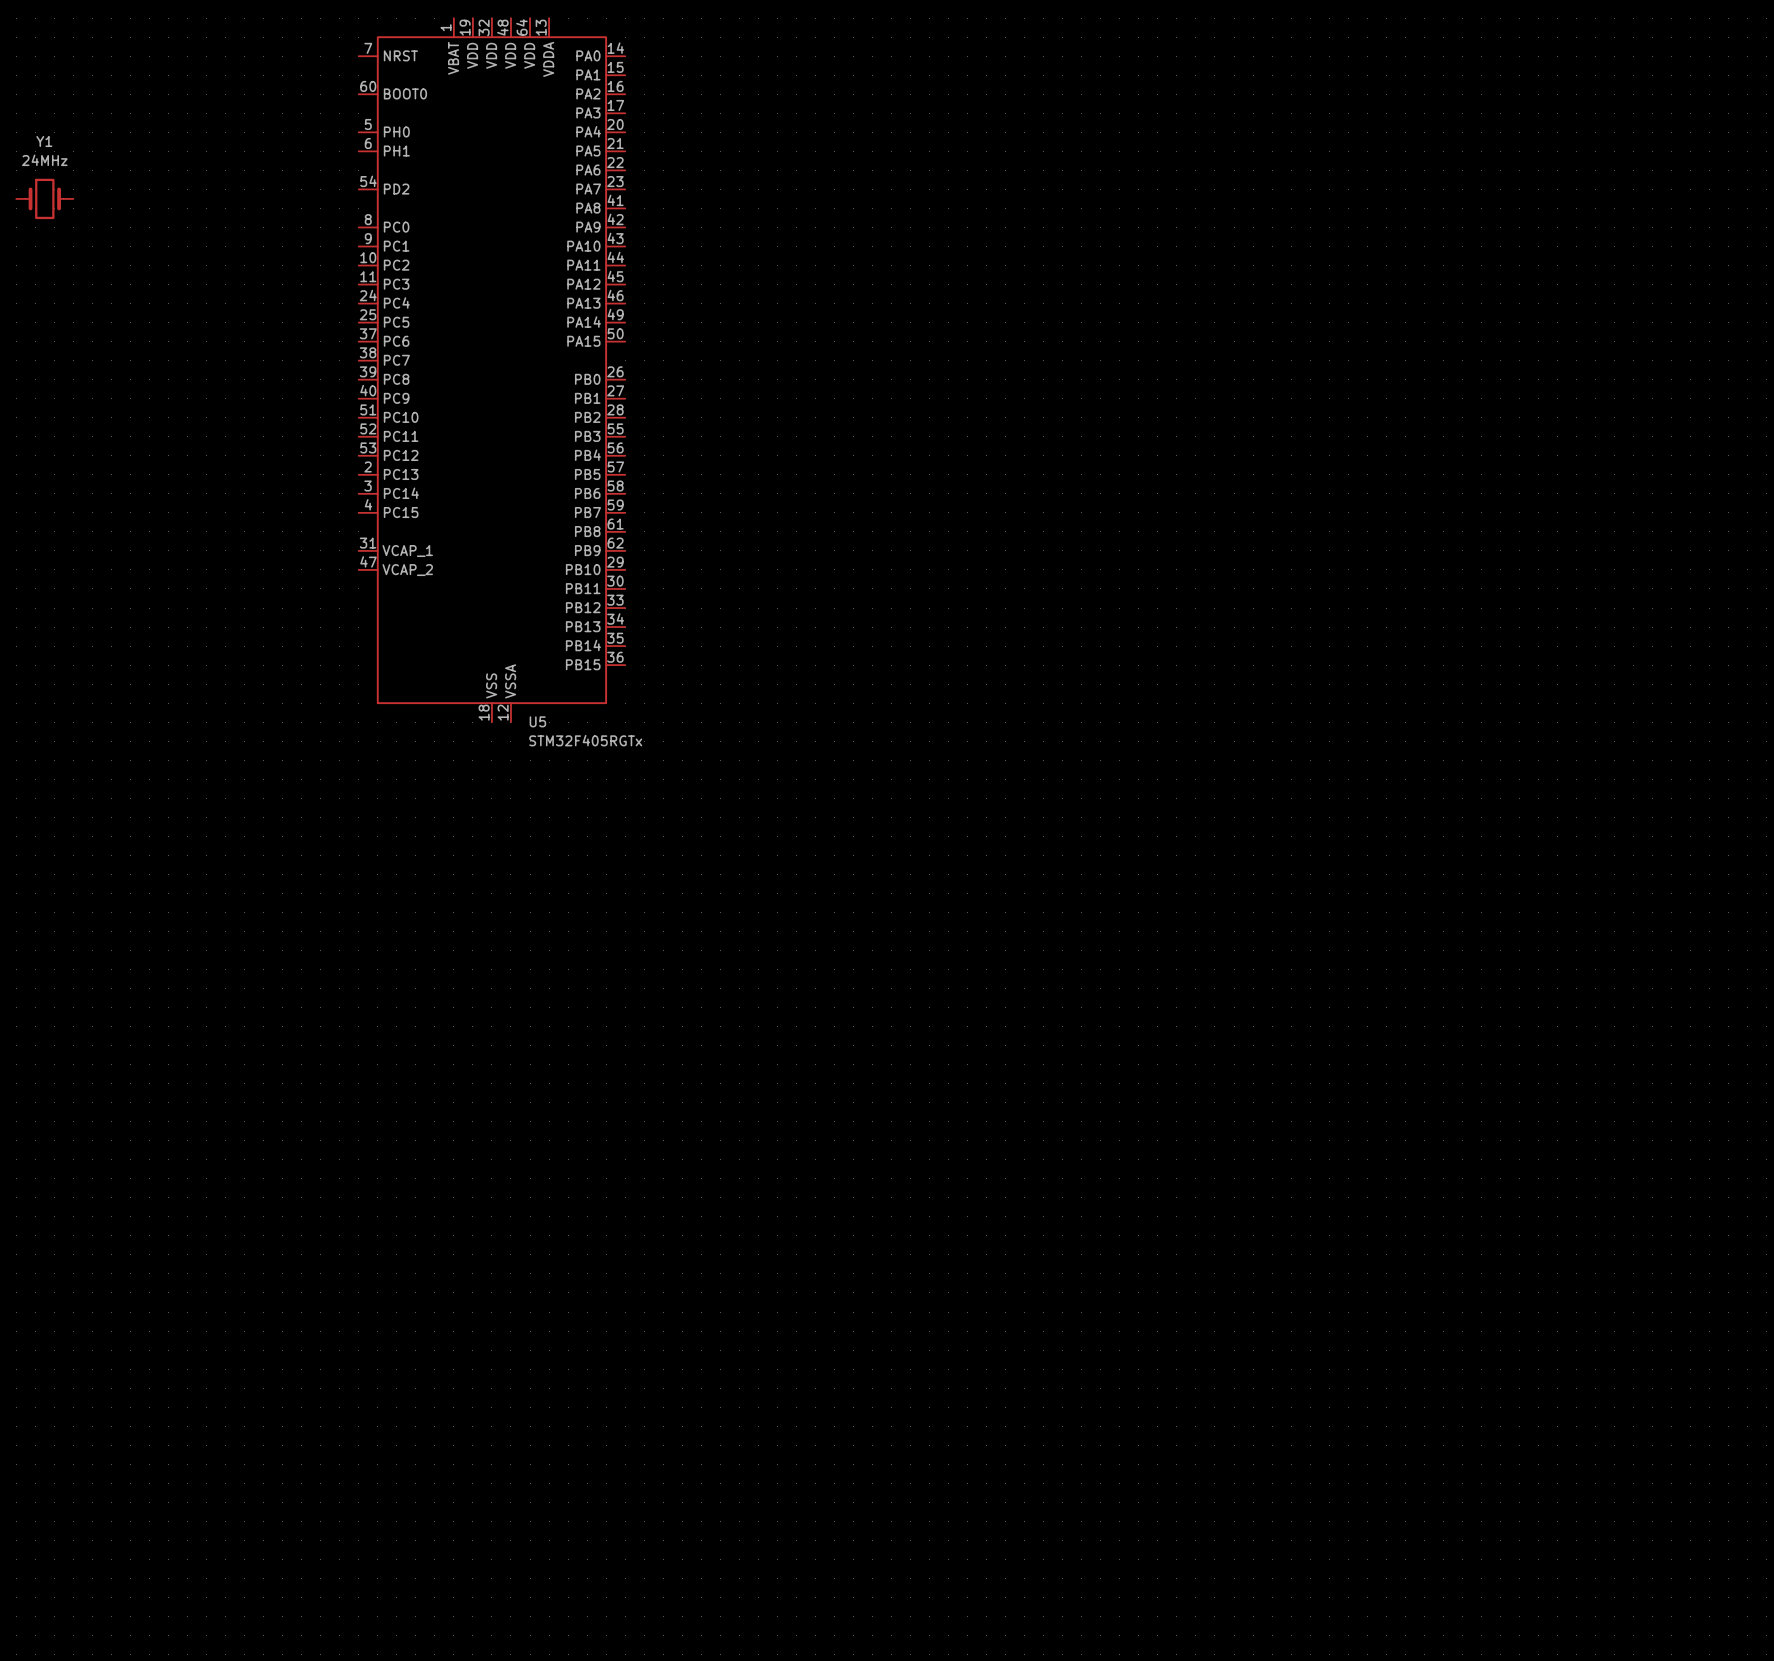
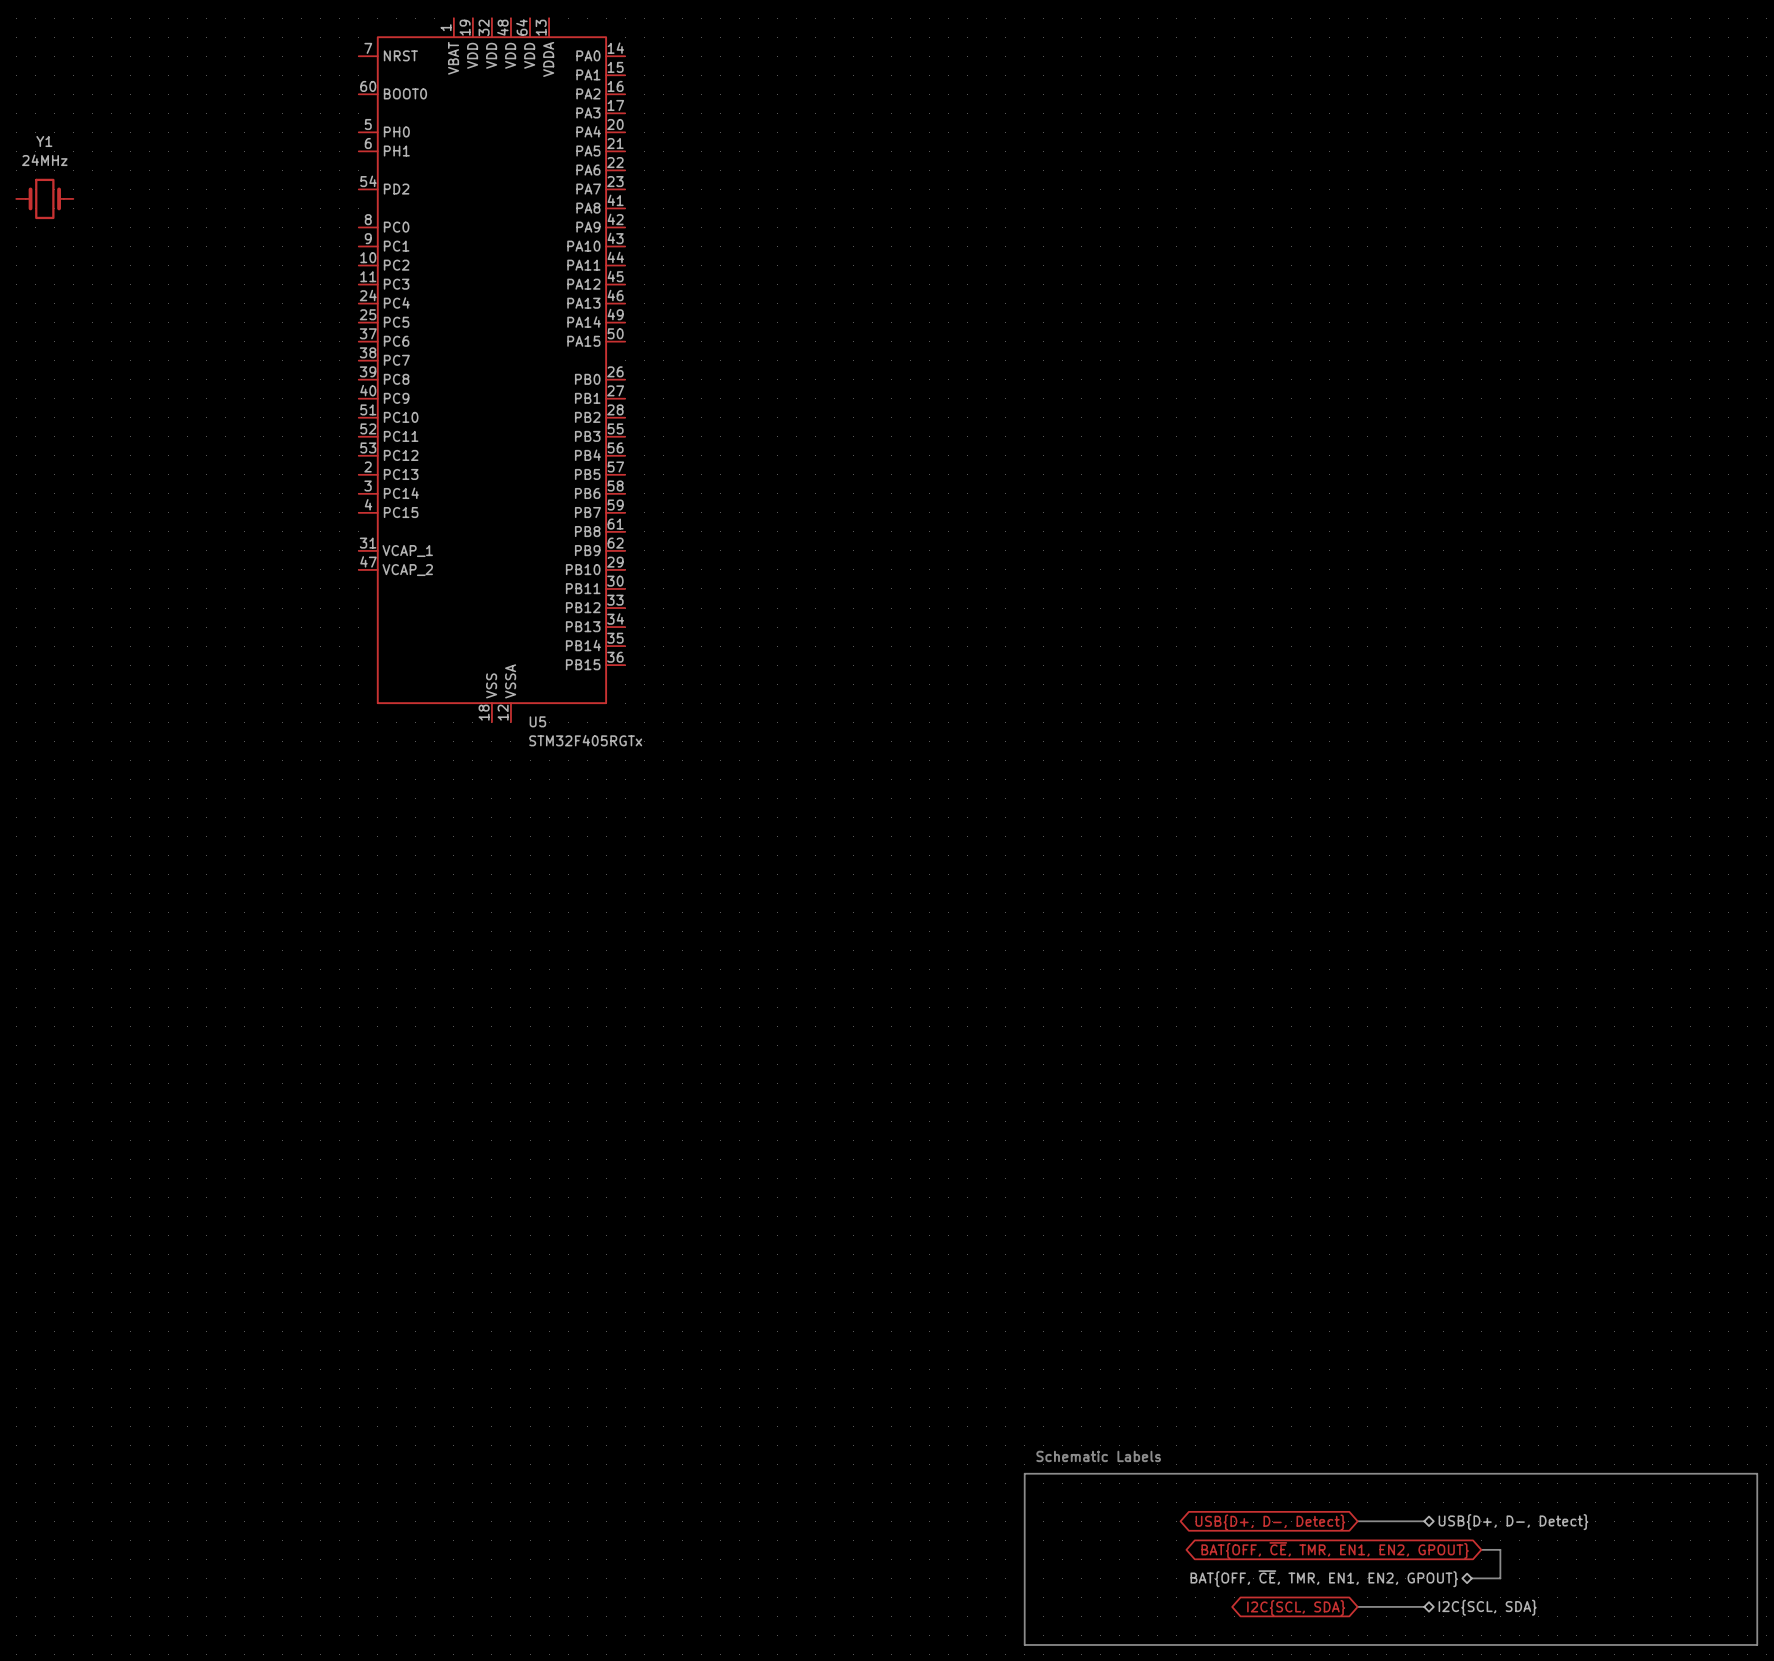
text: none -> Schematic Labels (1098, 1456)
line: none -> (1024, 1473) (1757, 1473) (1757, 1644) (1024, 1644) (1024, 1473)
bus: none -> (1357, 1521) (1424, 1521)
global label: none -> USB{D+, D-, Detect} (1270, 1522)
hierarchical label: none -> USB{D+, D-, Detect} (1513, 1522)
bus: none -> (1481, 1549) (1500, 1549) (1500, 1578) (1471, 1578)
global label: none -> BAT{OFF, ~{CE}, TMR, EN1, EN2, GPOUT} (1335, 1550)
hierarchical label: none -> BAT{OFF, ~{CE}, TMR, EN1, EN2, GPOUT} (1324, 1578)
bus: none -> (1357, 1606) (1424, 1606)
hierarchical label: none -> I2C{SCL, SDA} (1487, 1607)
global label: none -> I2C{SCL, SDA} (1296, 1608)

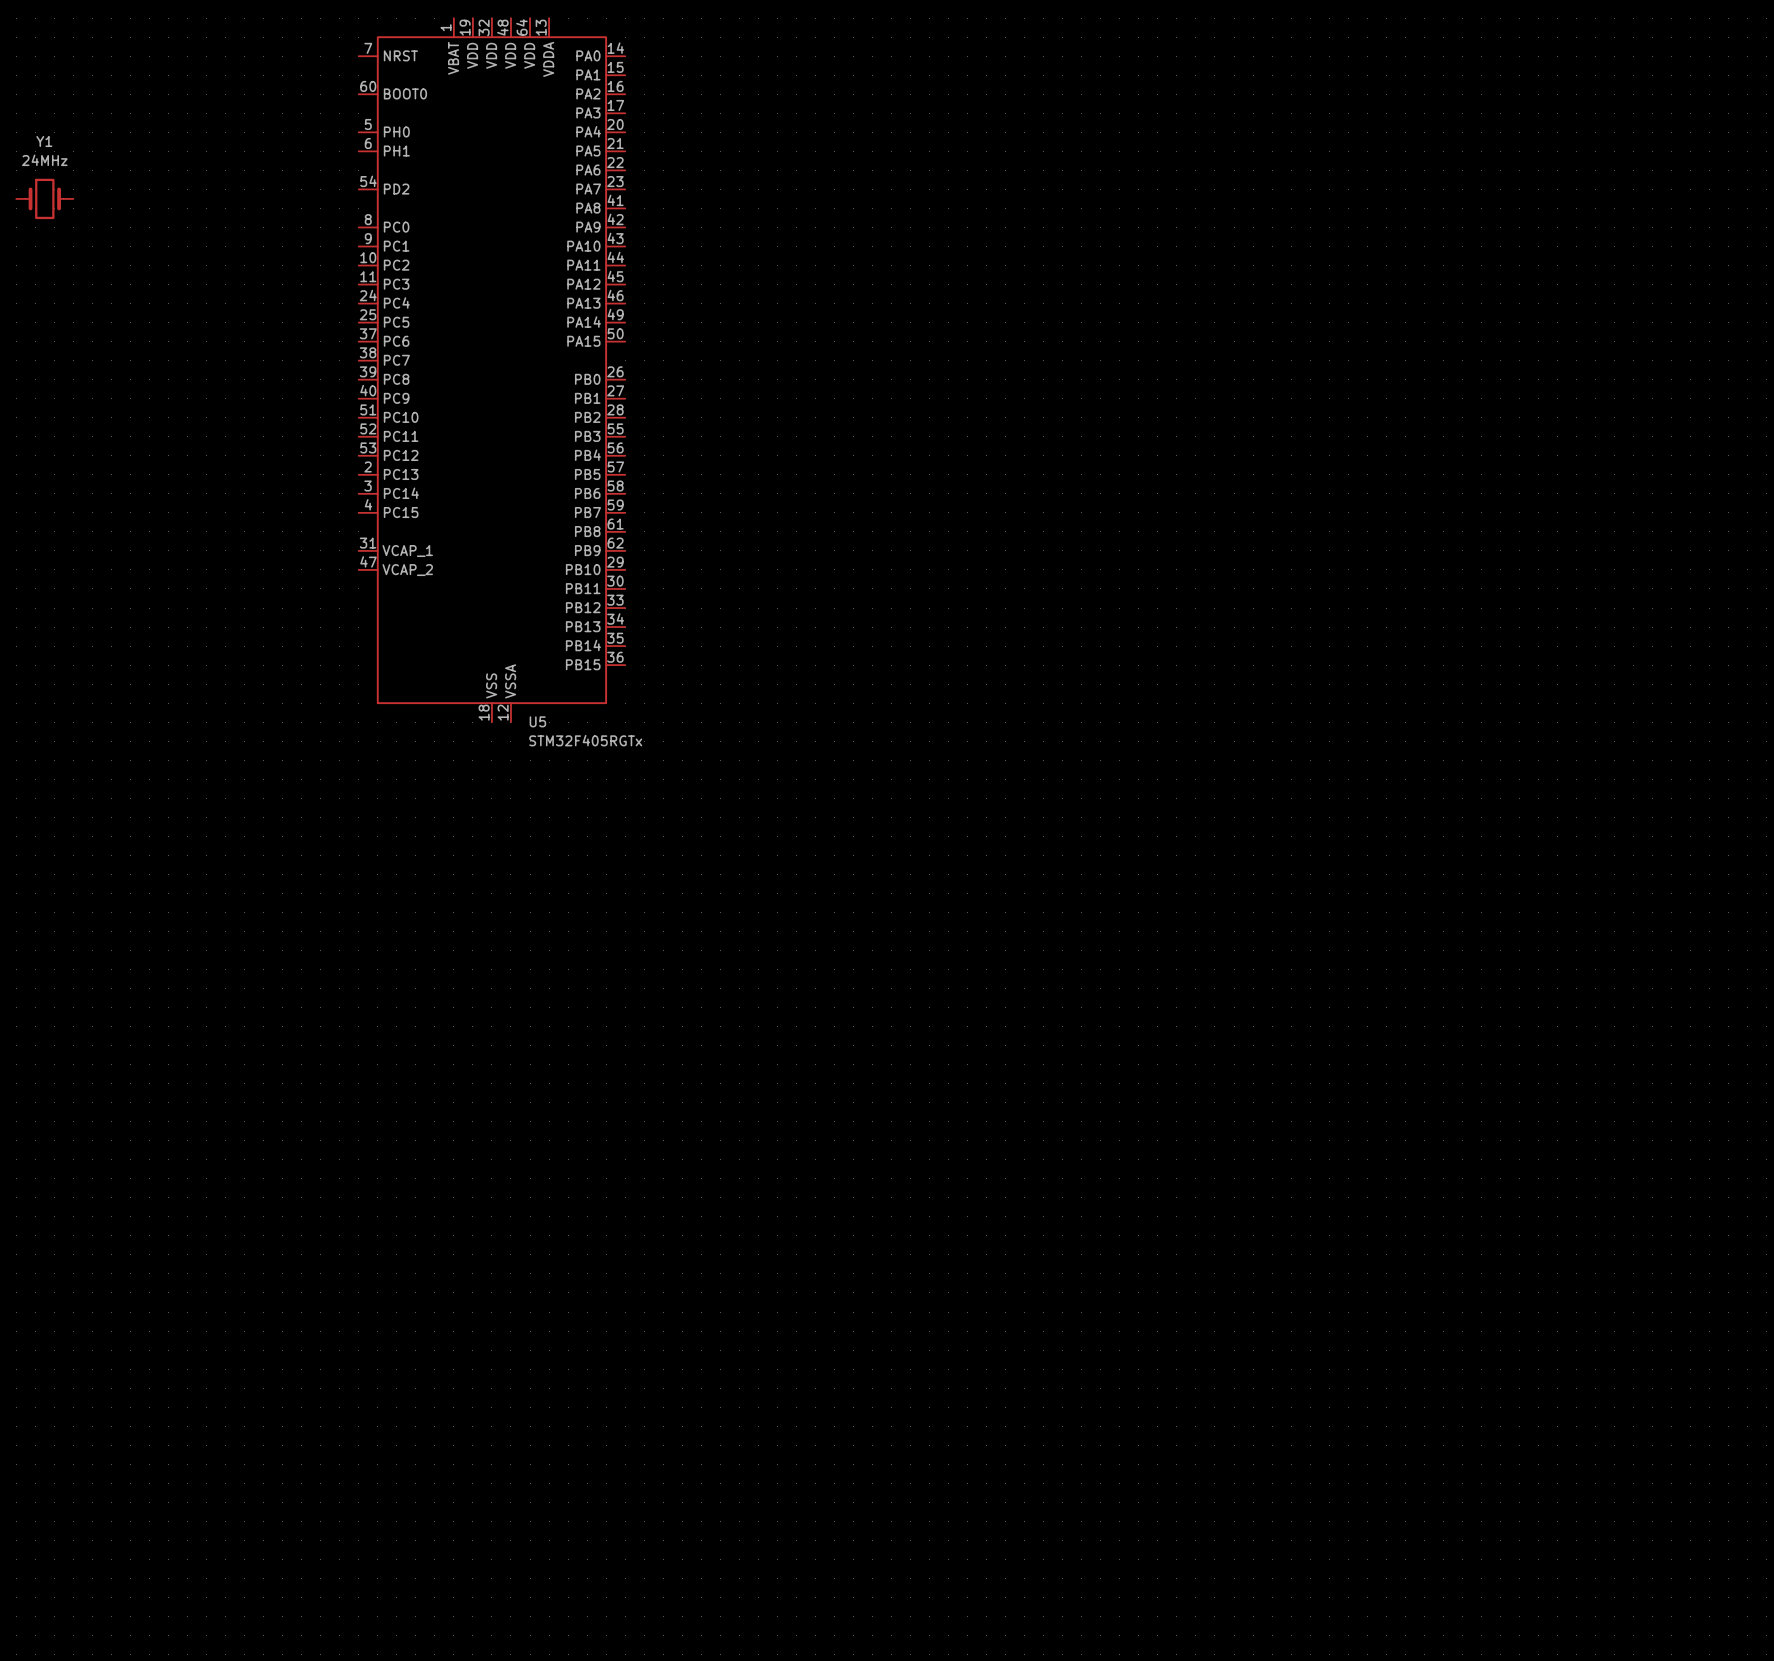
text: Schematic Labels (1098, 1456) -> none
line: (1024, 1473) (1757, 1473) (1757, 1644) (1024, 1644) (1024, 1473) -> none
bus: (1357, 1521) (1424, 1521) -> none
global label: USB{D+, D-, Detect} (1270, 1522) -> none
hierarchical label: USB{D+, D-, Detect} (1513, 1522) -> none
bus: (1481, 1549) (1500, 1549) (1500, 1578) (1471, 1578) -> none
global label: BAT{OFF, ~{CE}, TMR, EN1, EN2, GPOUT} (1335, 1550) -> none
hierarchical label: BAT{OFF, ~{CE}, TMR, EN1, EN2, GPOUT} (1324, 1578) -> none
bus: (1357, 1606) (1424, 1606) -> none
hierarchical label: I2C{SCL, SDA} (1487, 1607) -> none
global label: I2C{SCL, SDA} (1296, 1608) -> none

